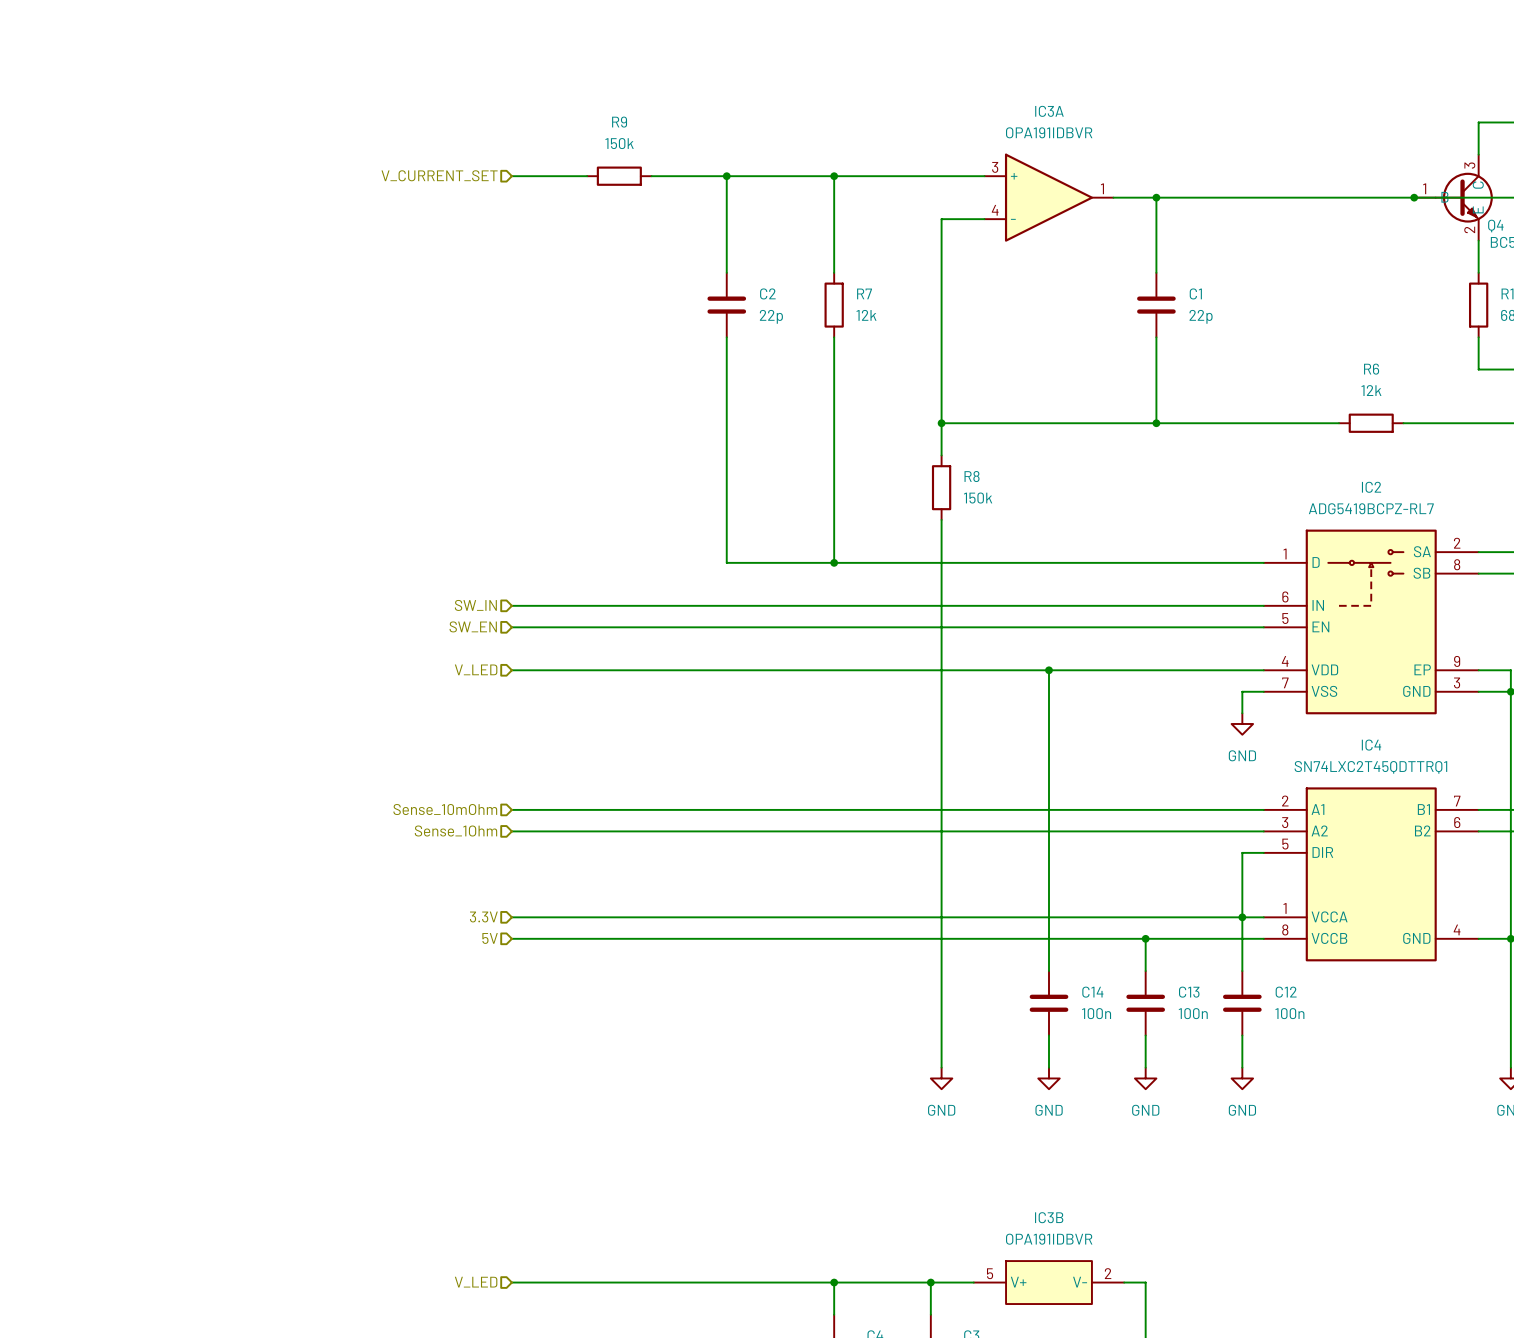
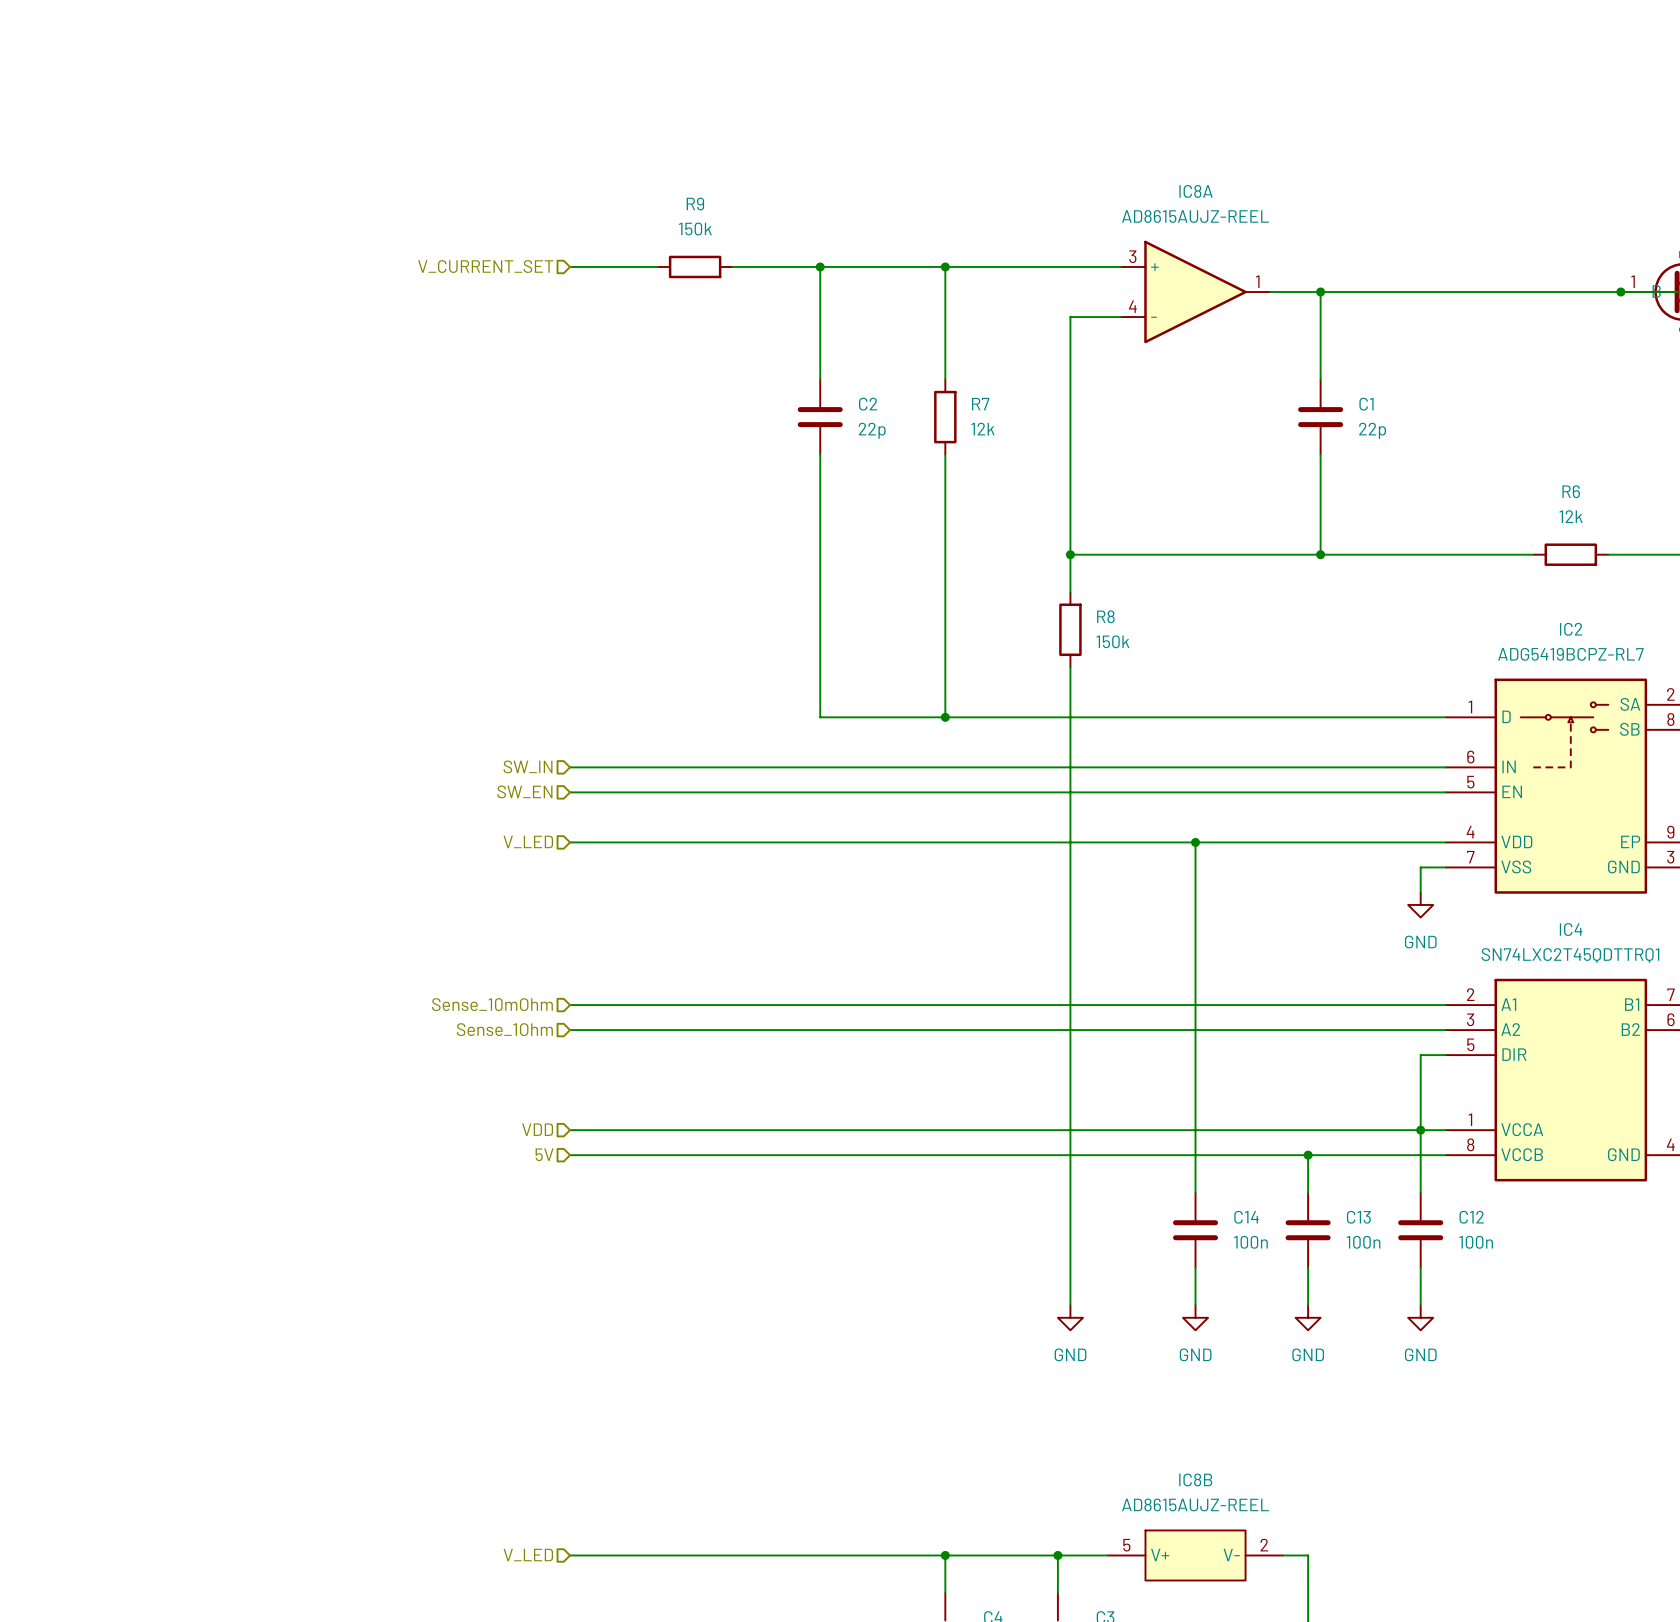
IC3A name: IC3A (1049, 111) -> IC8A (1196, 191)
IC3A value: OPA191IDBVR (1049, 132) -> AD8615AUJZ-REEL (1195, 216)
hierarchical label: 3.3V (483, 916) -> VDD (537, 1129)
IC3B name: IC3B (1049, 1217) -> IC8B (1195, 1479)
IC3B value: OPA191IDBVR (1049, 1239) -> AD8615AUJZ-REEL (1195, 1504)

